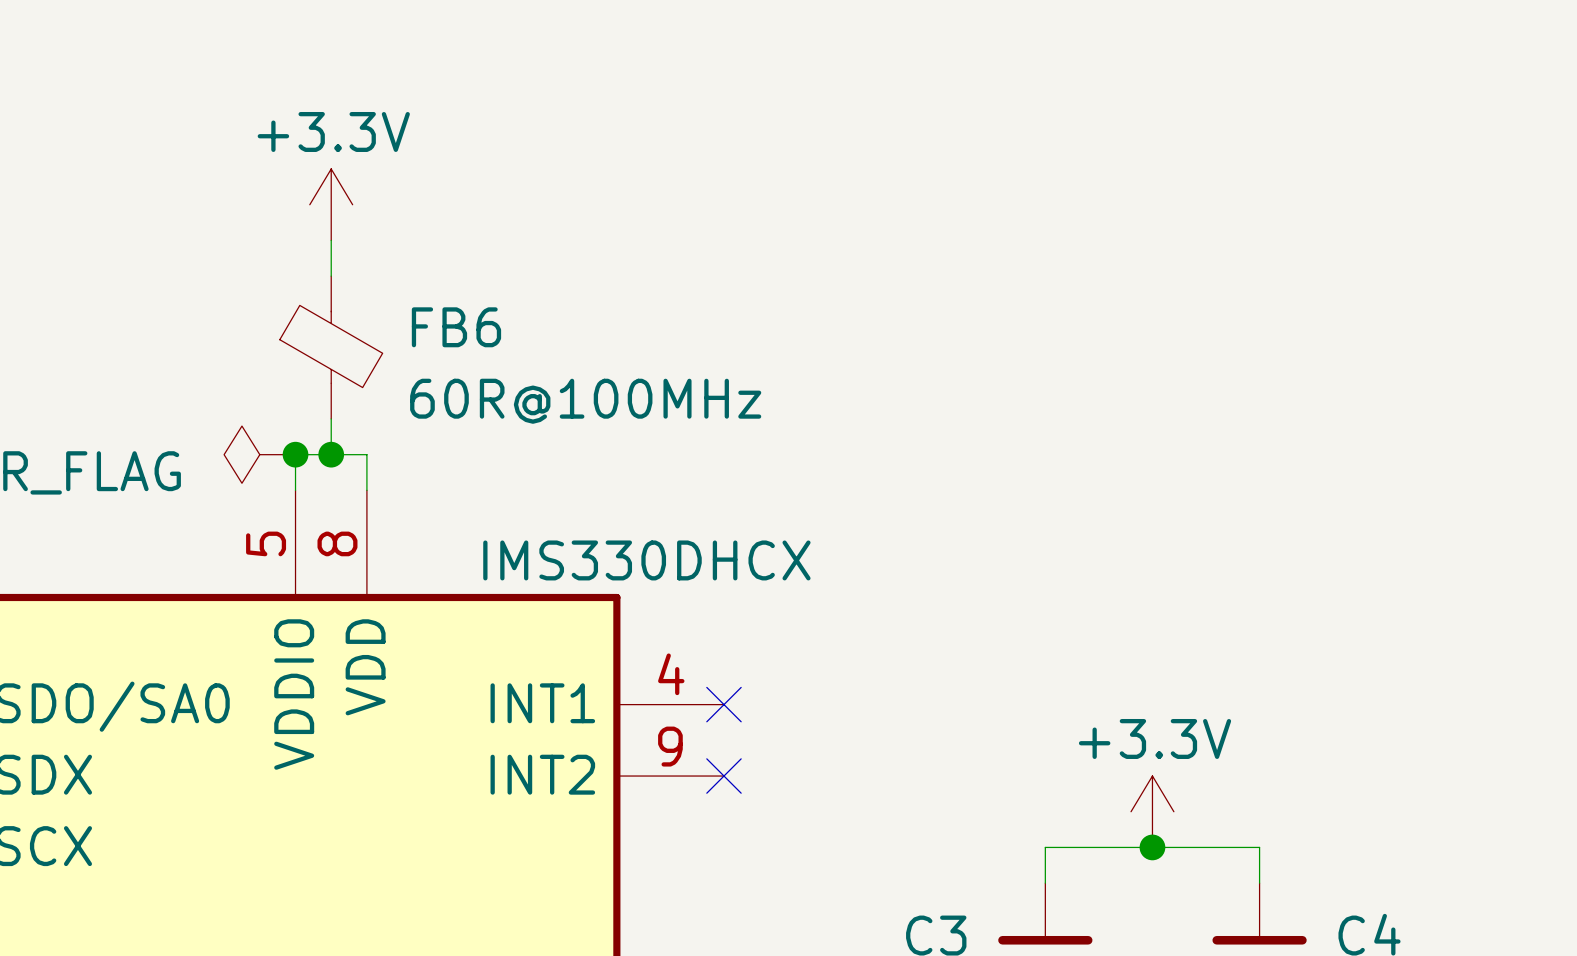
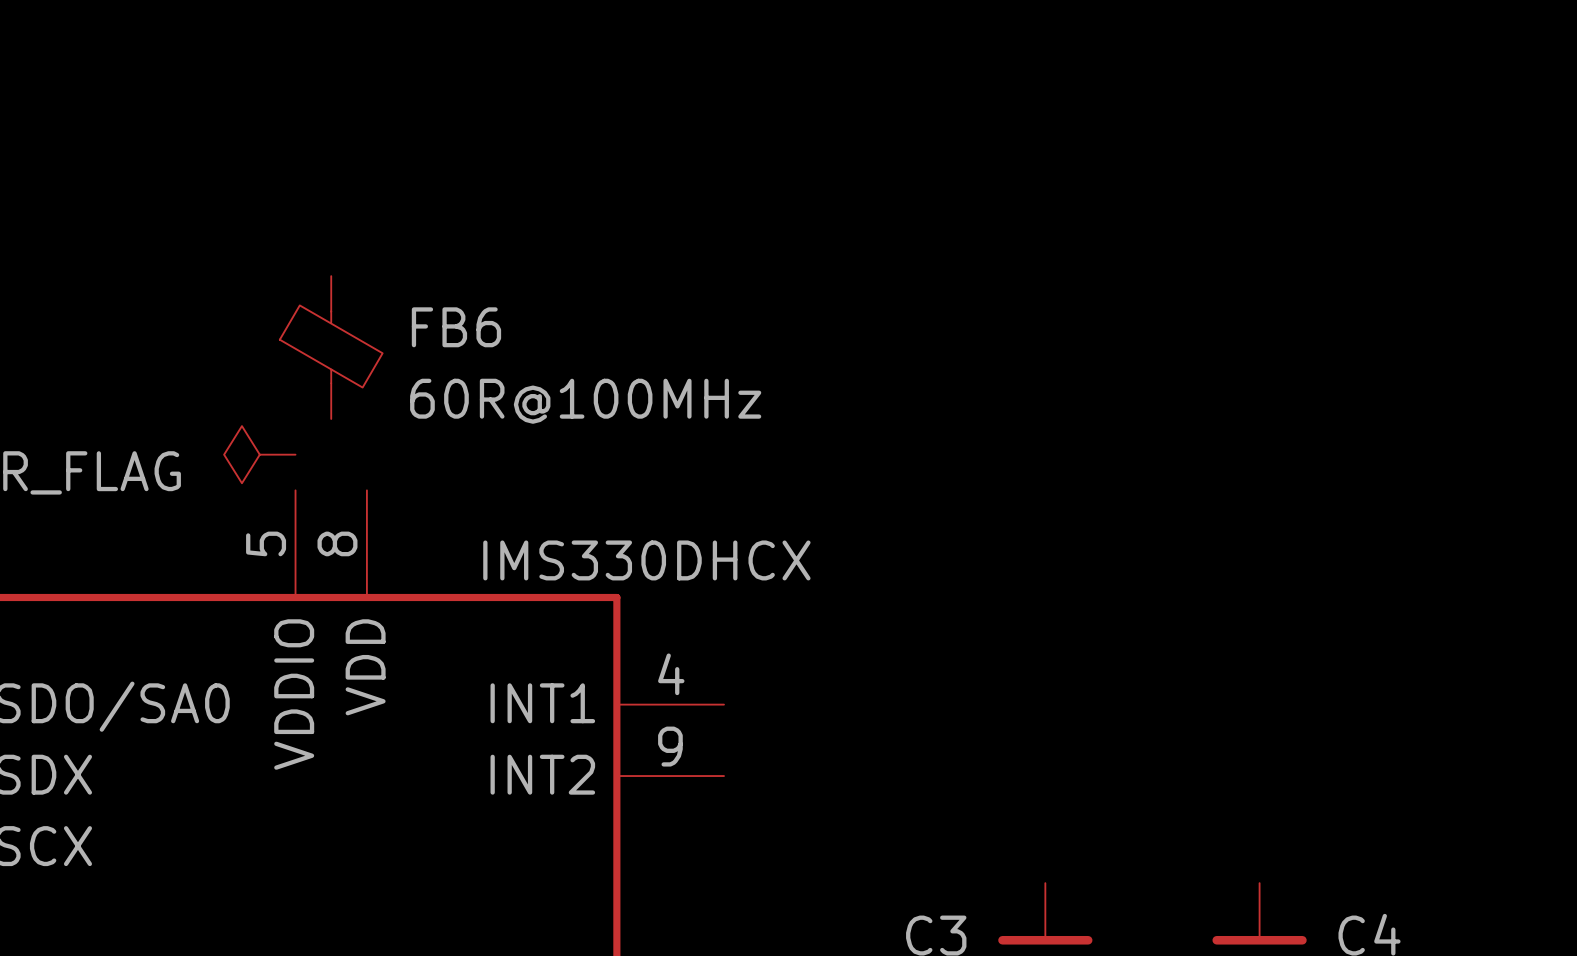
power symbol: +3.3V (331, 204) -> none
wire: (331, 240) (331, 276) -> none
wire: (331, 418) (331, 454) -> none
junction: (295, 454) -> none
junction: (331, 454) -> none
wire: (295, 490) (295, 454) (366, 454) (366, 490) -> none
no-connect mark: (723, 704) -> none
no-connect mark: (723, 776) -> none
power symbol: +3.3V (1152, 811) -> none
junction: (1152, 847) -> none
wire: (1045, 883) (1045, 847) (1259, 847) (1259, 883) -> none

